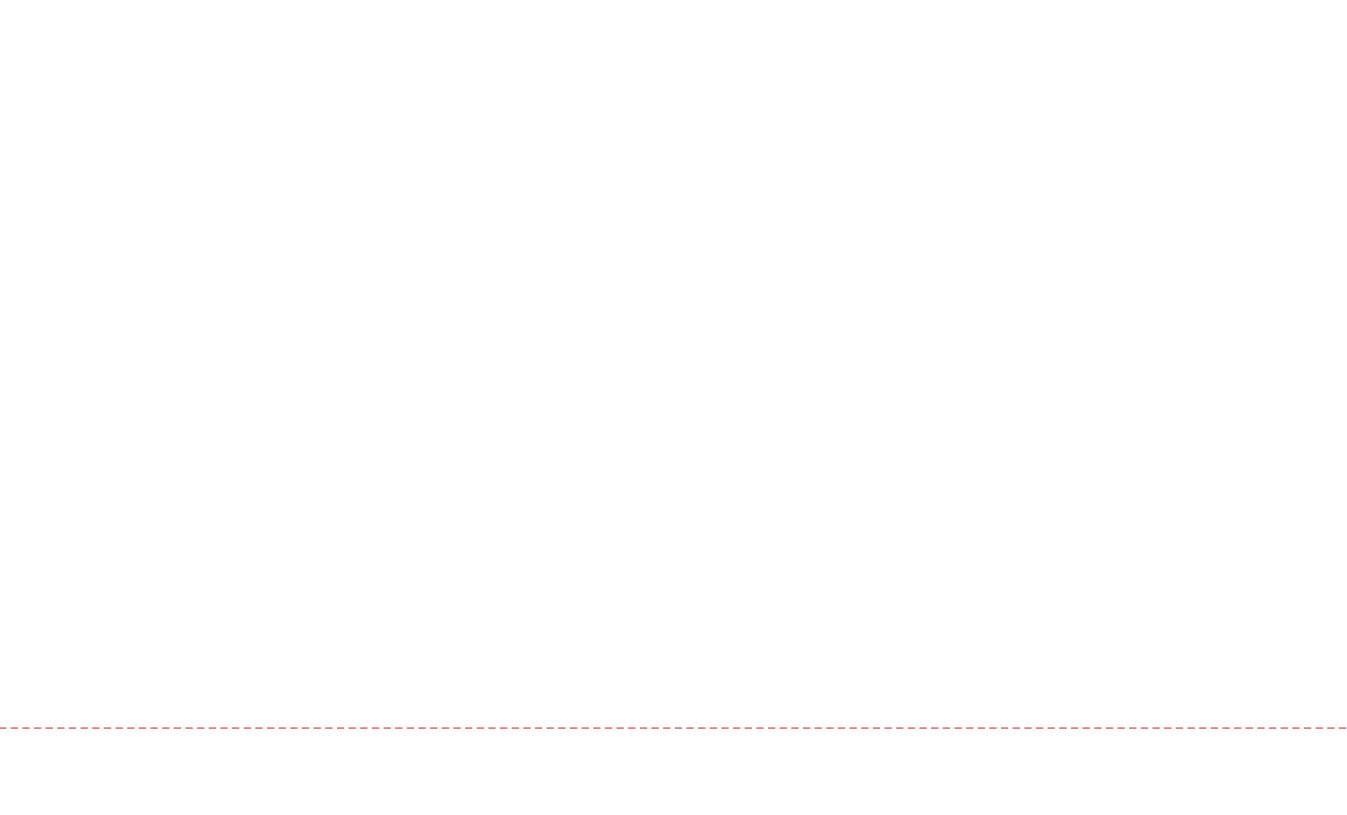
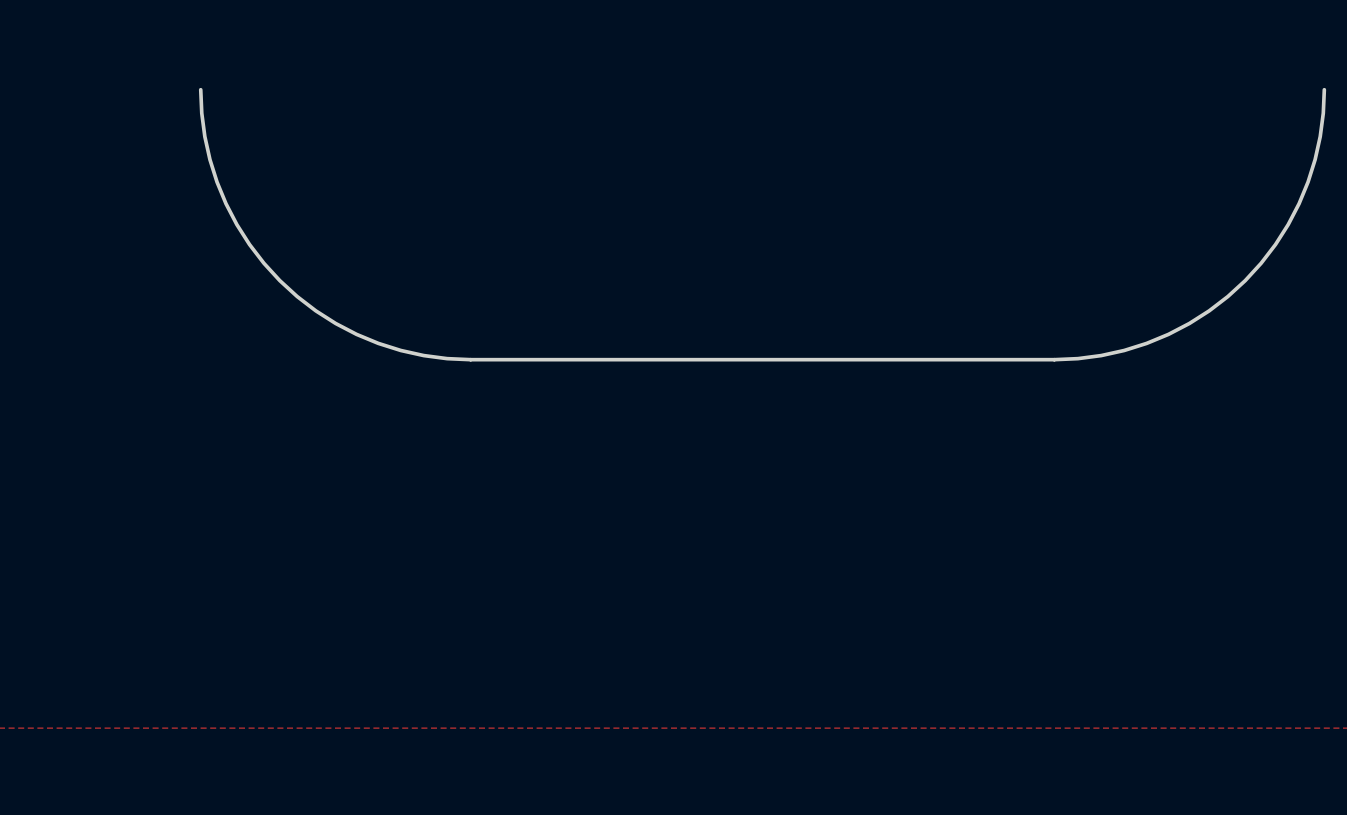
board edge: none -> (200, 89) (204, 136) (209, 159) (226, 203) (249, 244) (279, 280) (315, 310) (356, 334) (400, 350) (423, 355) (470, 359) (1054, 359) (1101, 355) (1146, 343) (1168, 334) (1209, 310) (1245, 280) (1275, 244) (1299, 203) (1315, 159) (1320, 136) (1324, 89)

